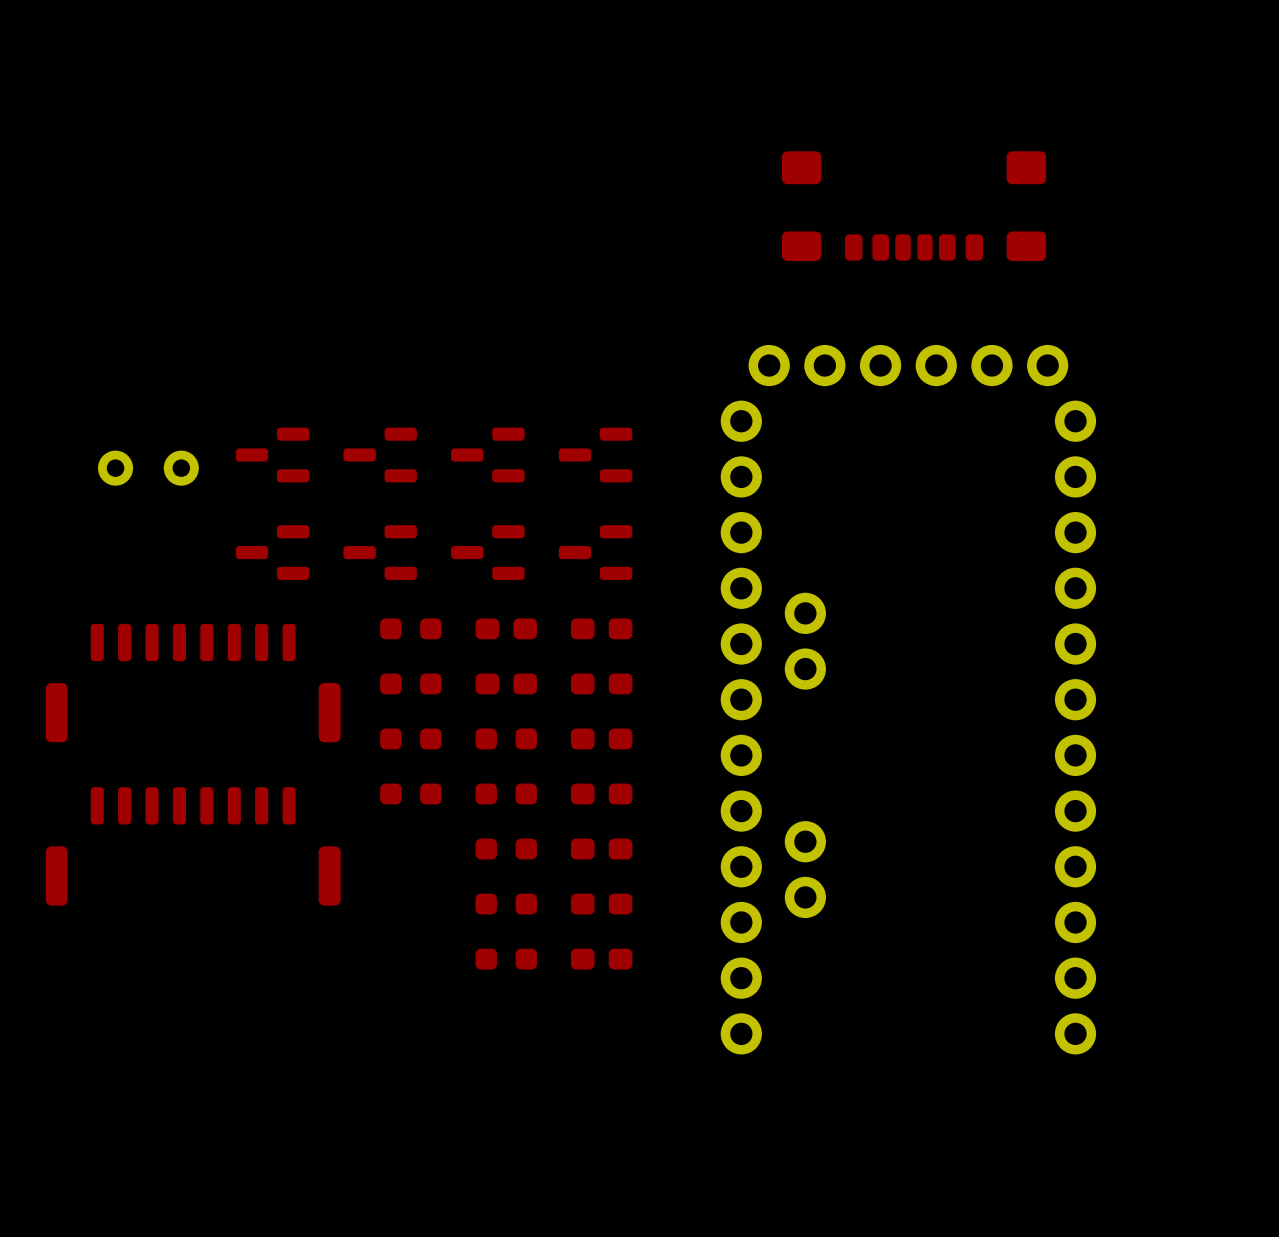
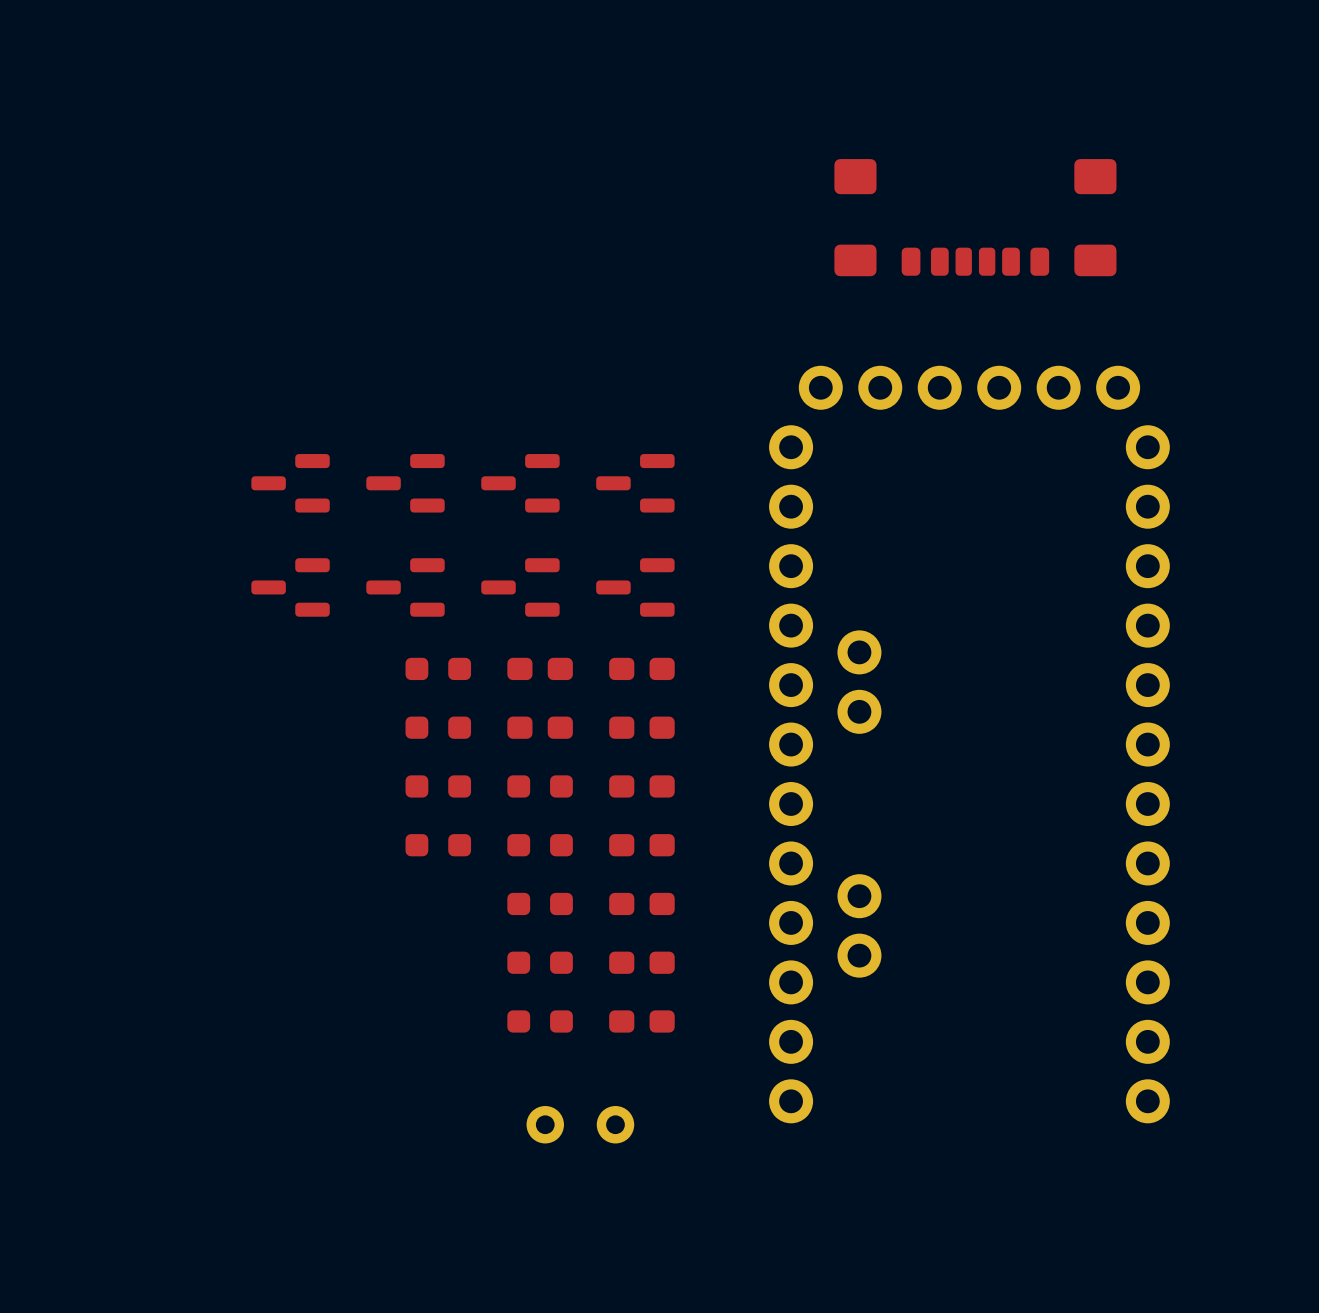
part: (148, 468) -> none
part: (193, 683) -> none
part: (193, 846) -> none
part: none -> (580, 1124)

